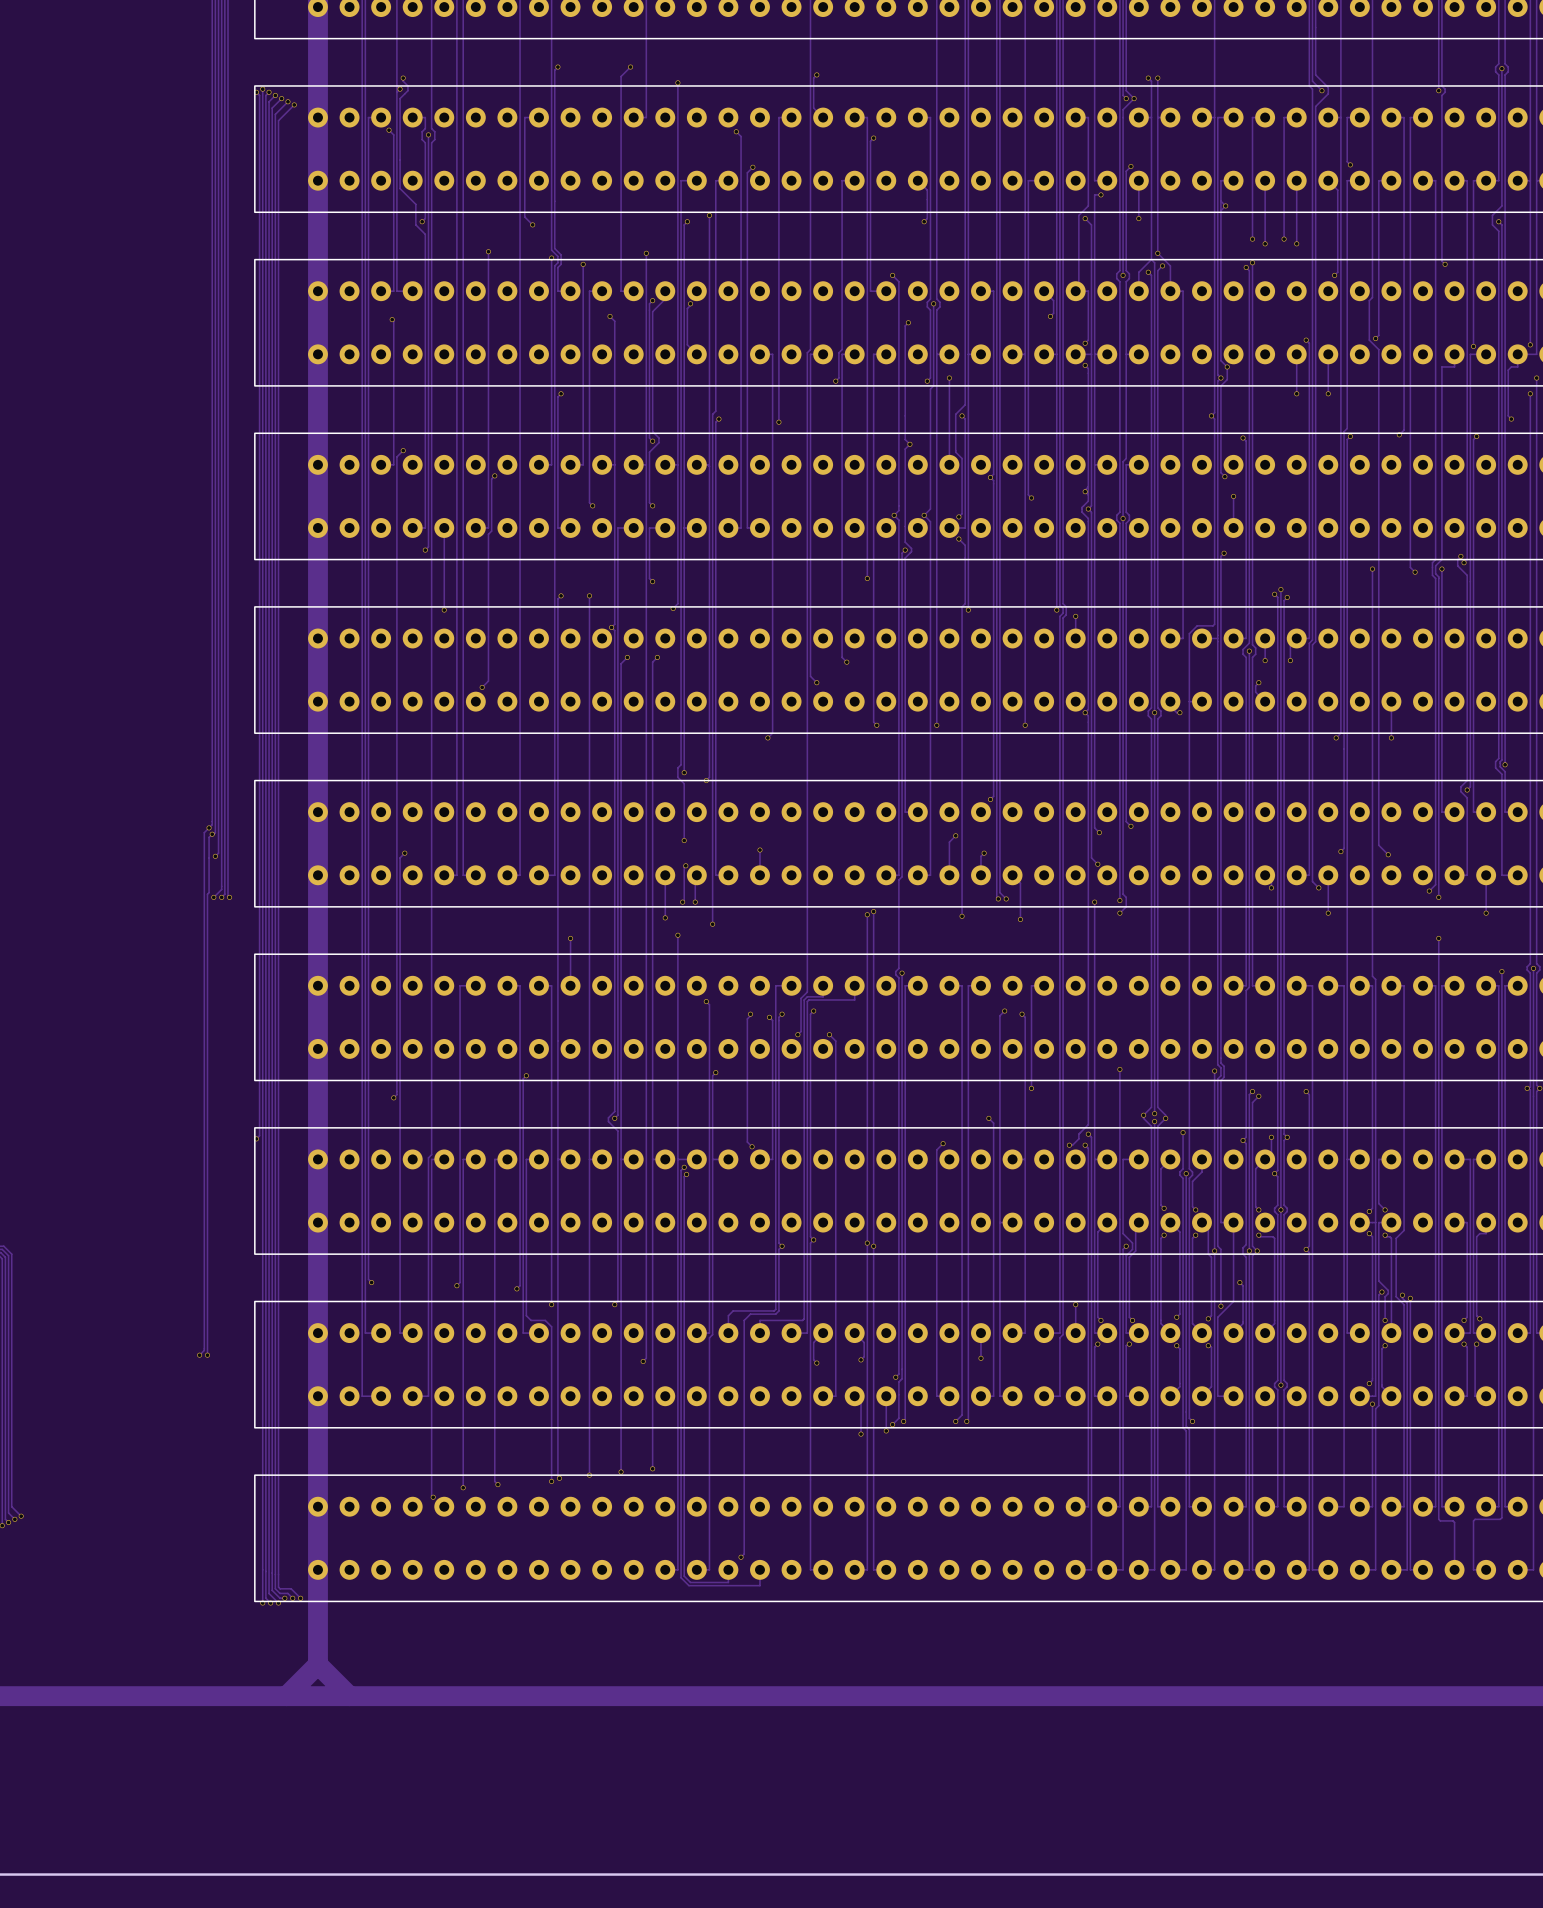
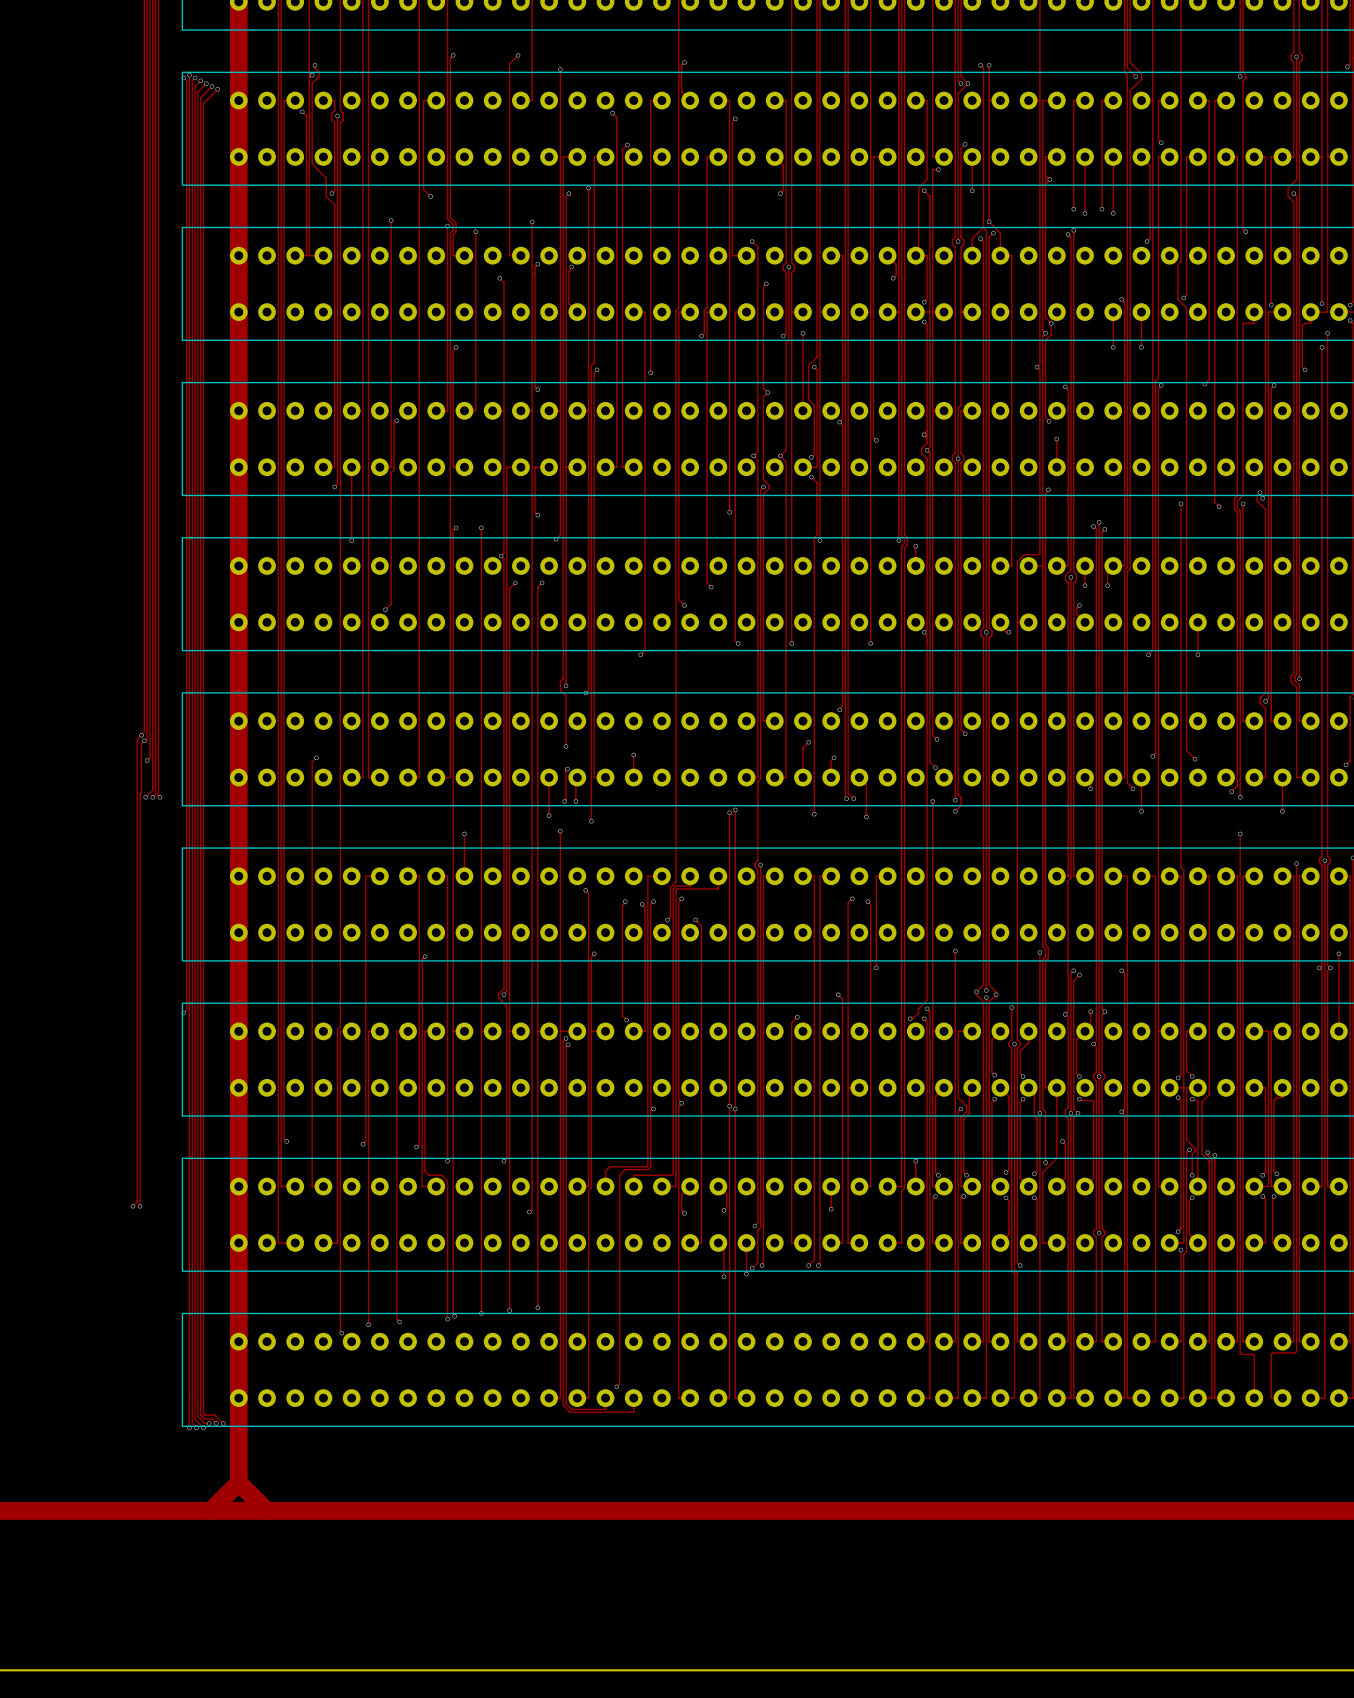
track: (602, 291) (589, 291) (589, 502) (592, 505) -> none
track: (665, 291) (665, 299) (652, 311) (652, 431) (658, 438) (658, 442) (649, 452) (649, 502) (652, 505) -> none
track: (392, 319) (393, 321) (393, 464) (381, 464) -> none
via: (392, 319) -> none
track: (403, 450) (396, 456) (396, 1094) (393, 1097) -> none
via: (403, 450) -> none
via: (592, 505) -> none
via: (652, 505) -> none
via: (393, 1097) -> none

